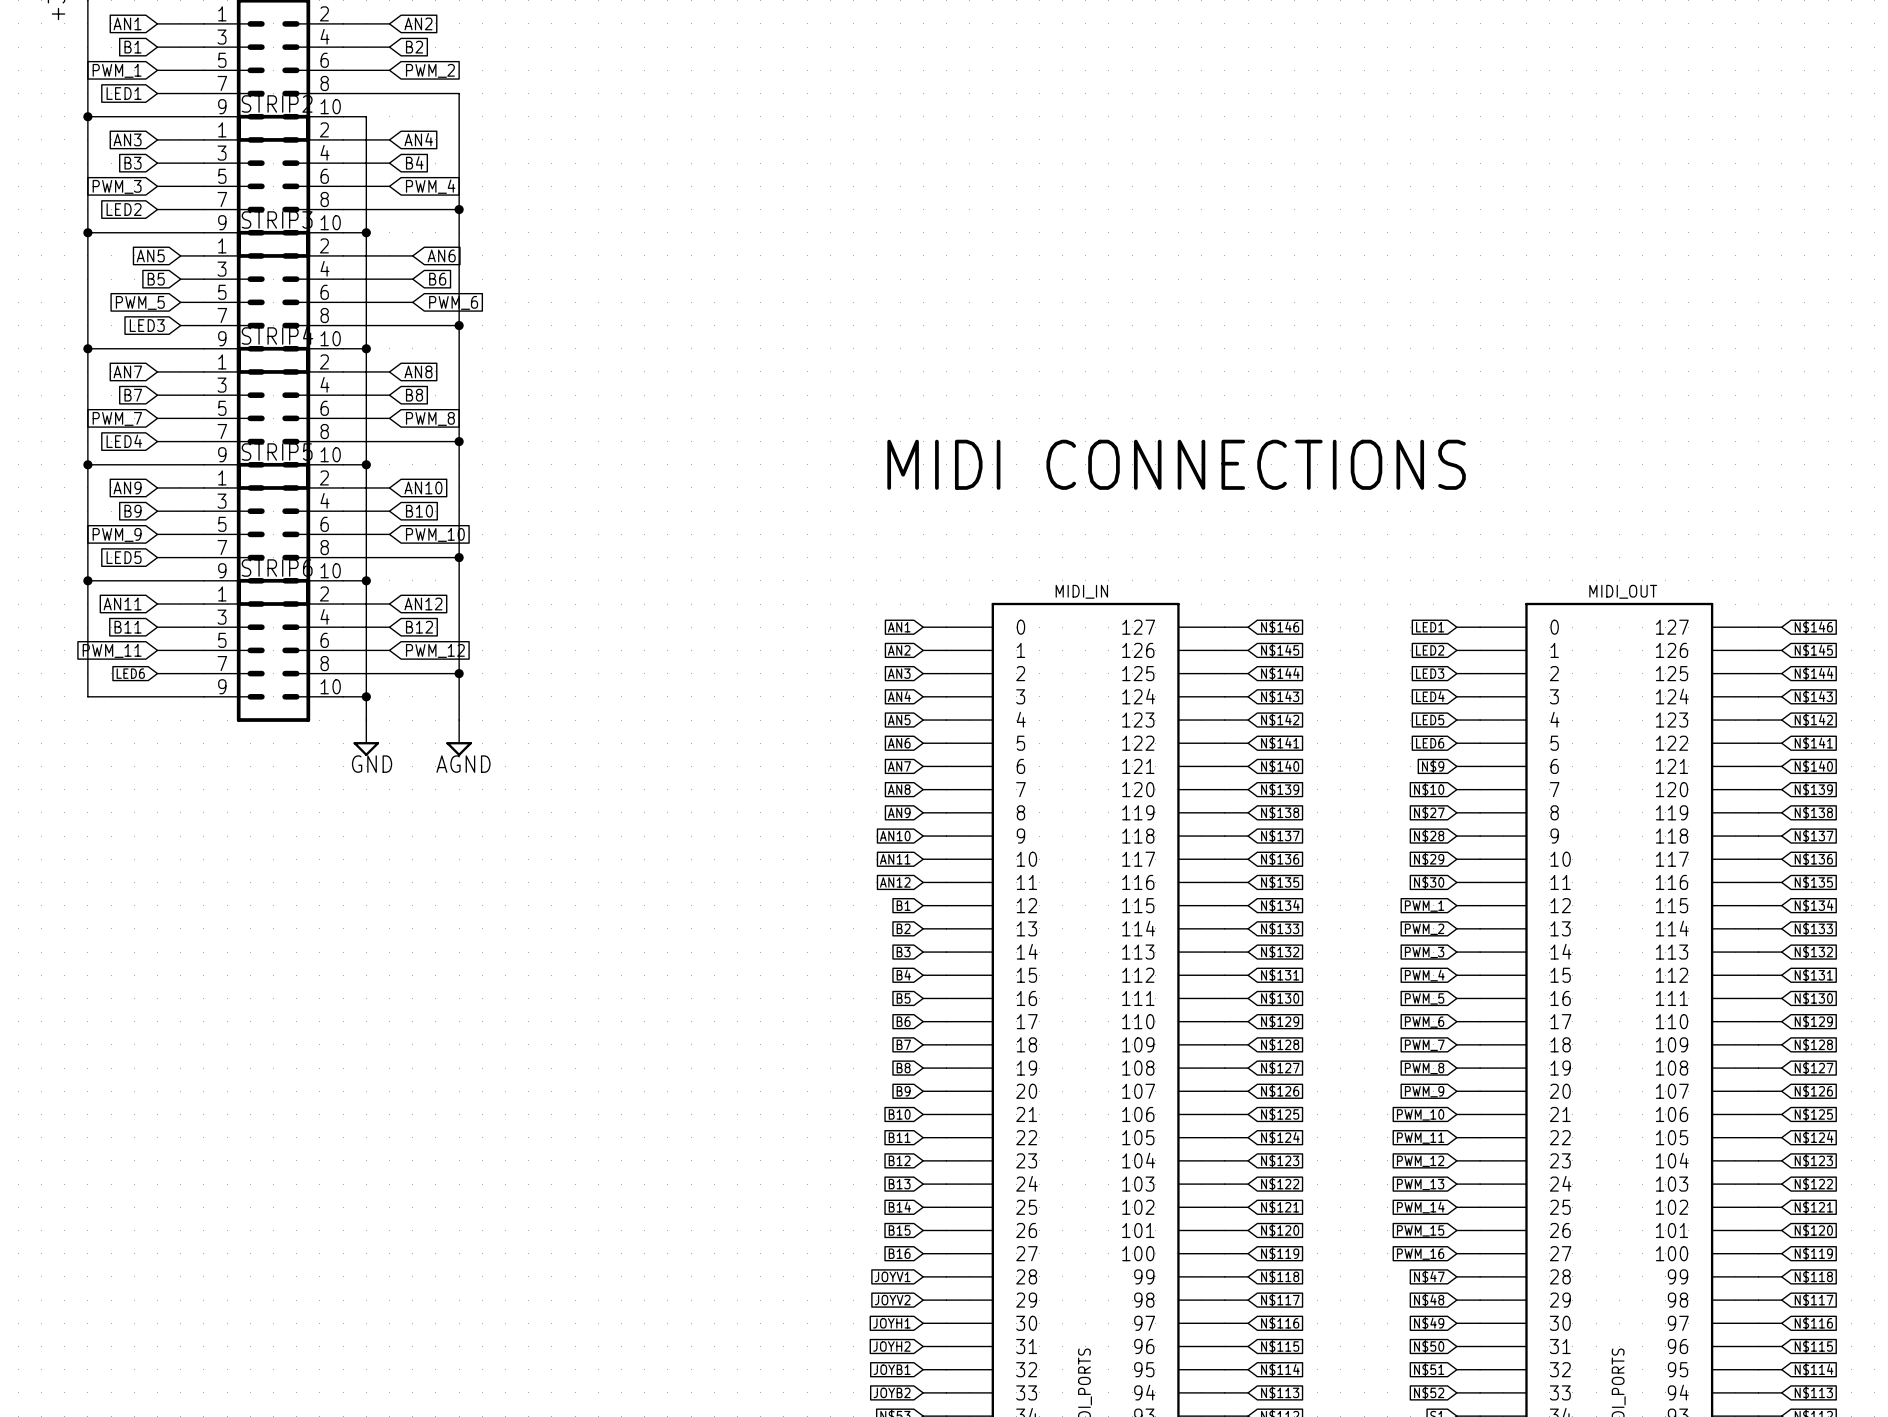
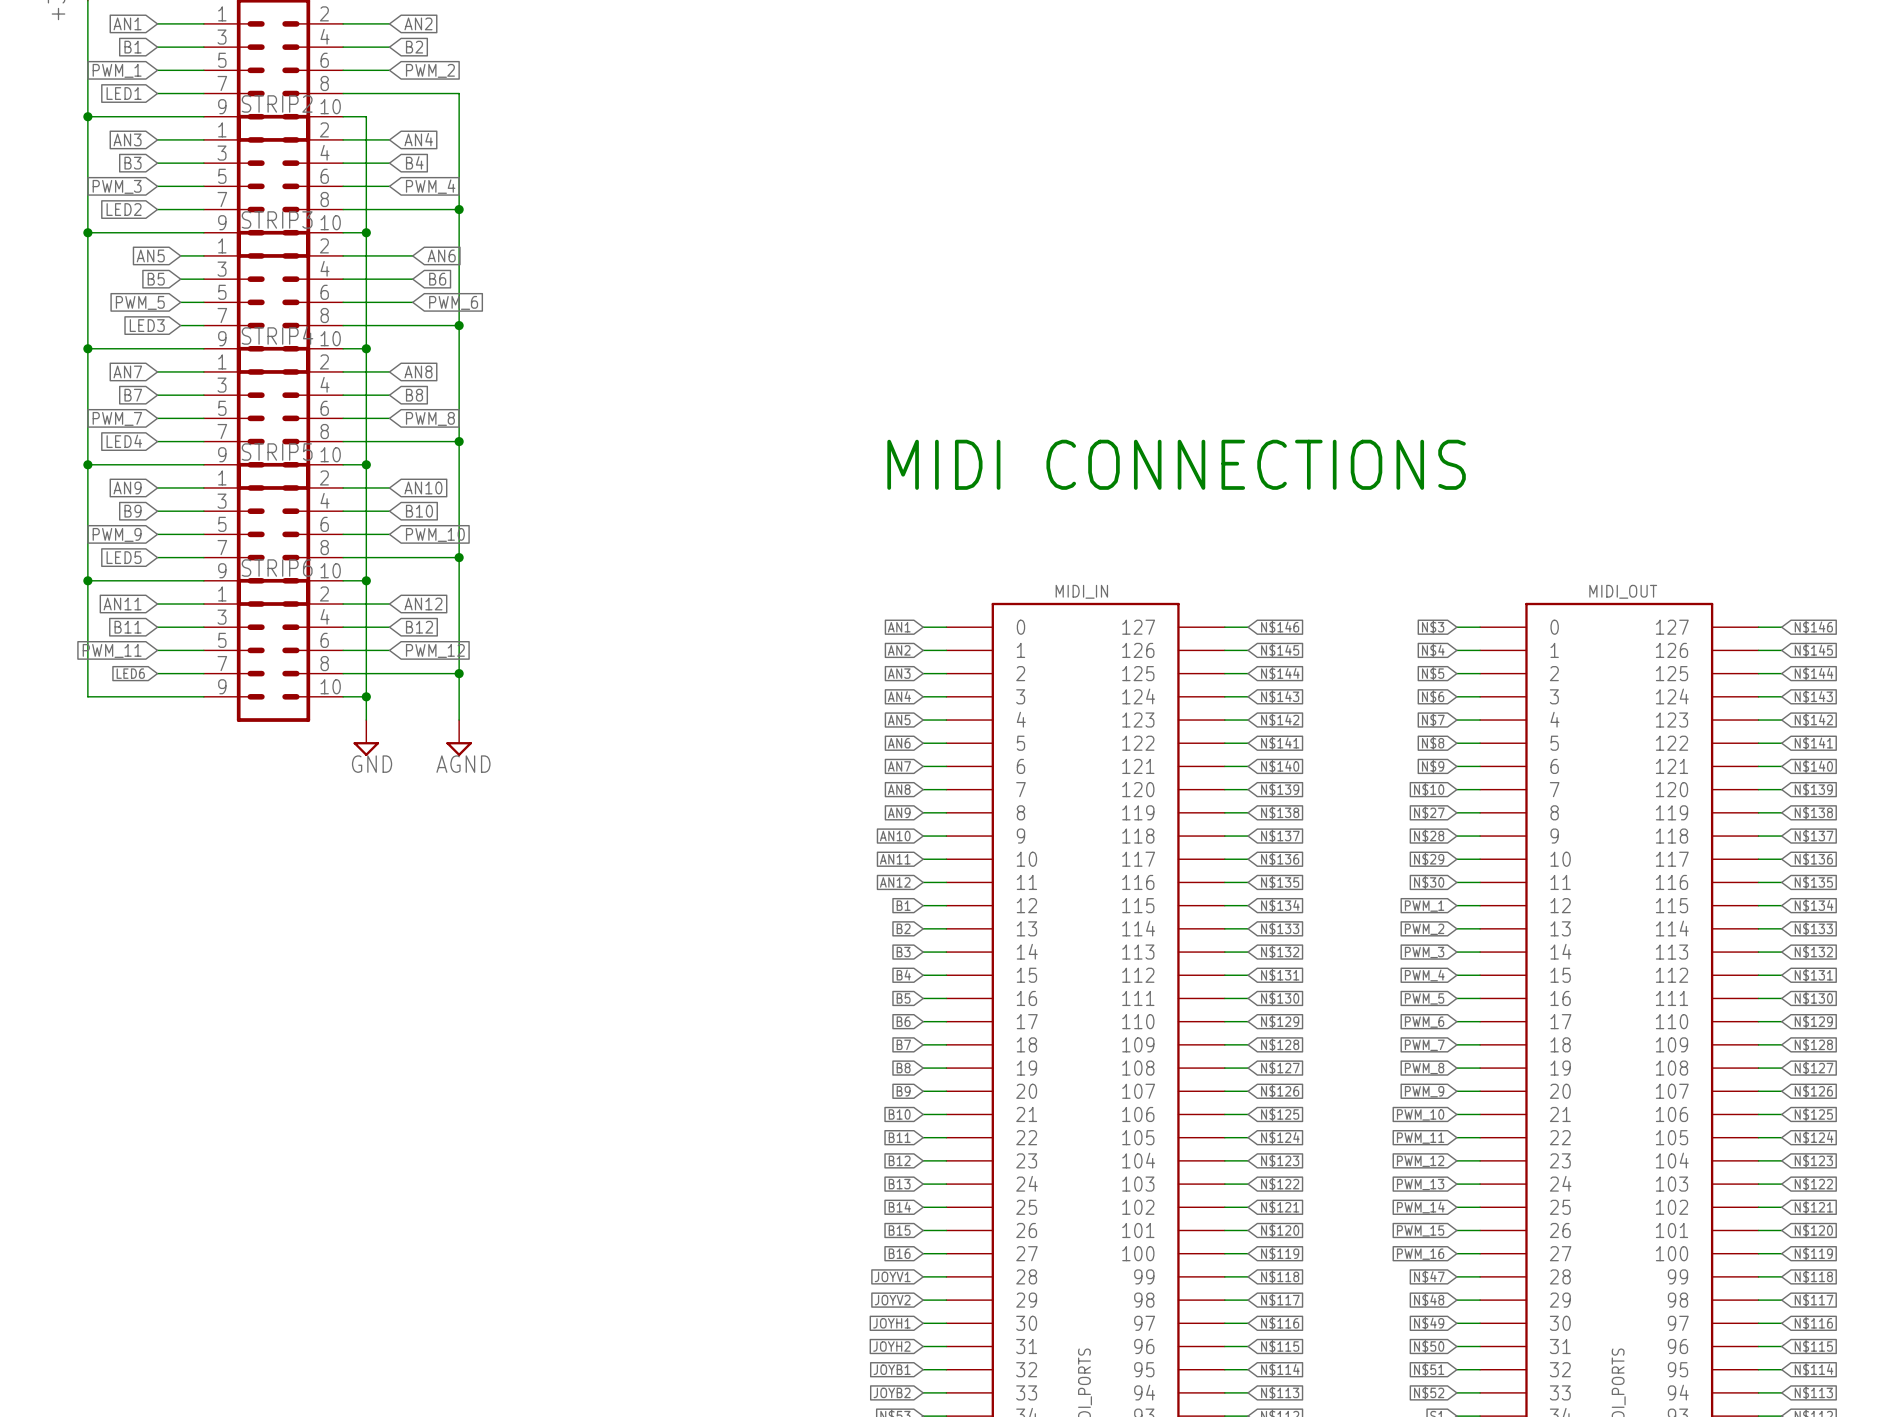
global label: LED1 (1430, 627) -> N$3 (1433, 627)
global label: LED2 (1430, 650) -> N$4 (1433, 650)
global label: LED3 (1430, 673) -> N$5 (1433, 673)
global label: LED4 (1430, 696) -> N$6 (1433, 696)
global label: LED5 (1430, 720) -> N$7 (1433, 720)
global label: LED6 (1430, 743) -> N$8 (1433, 743)

